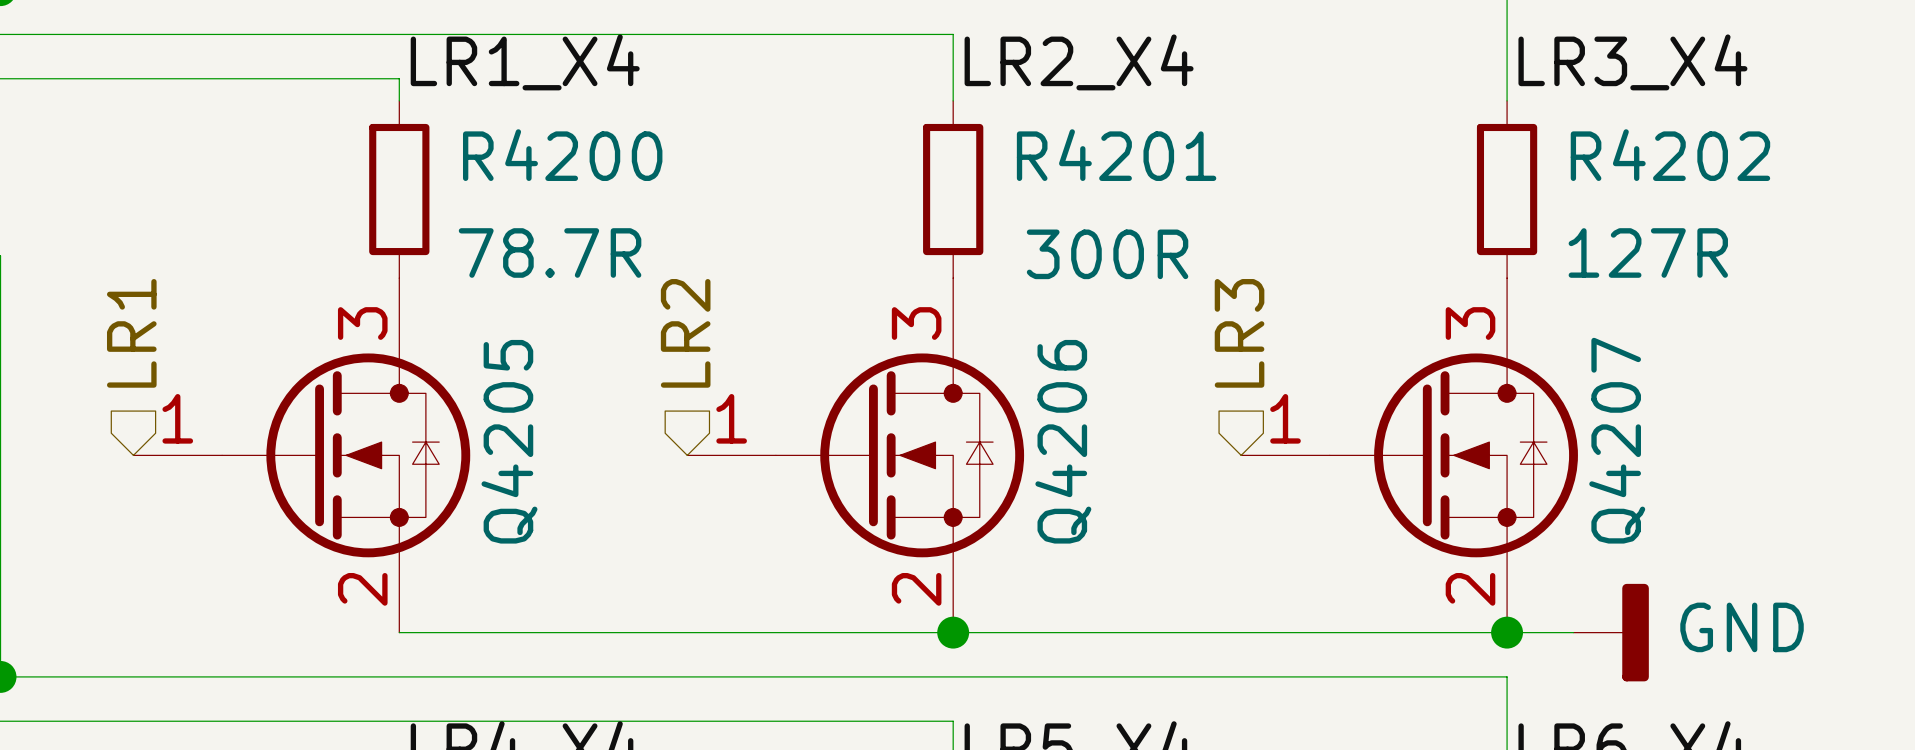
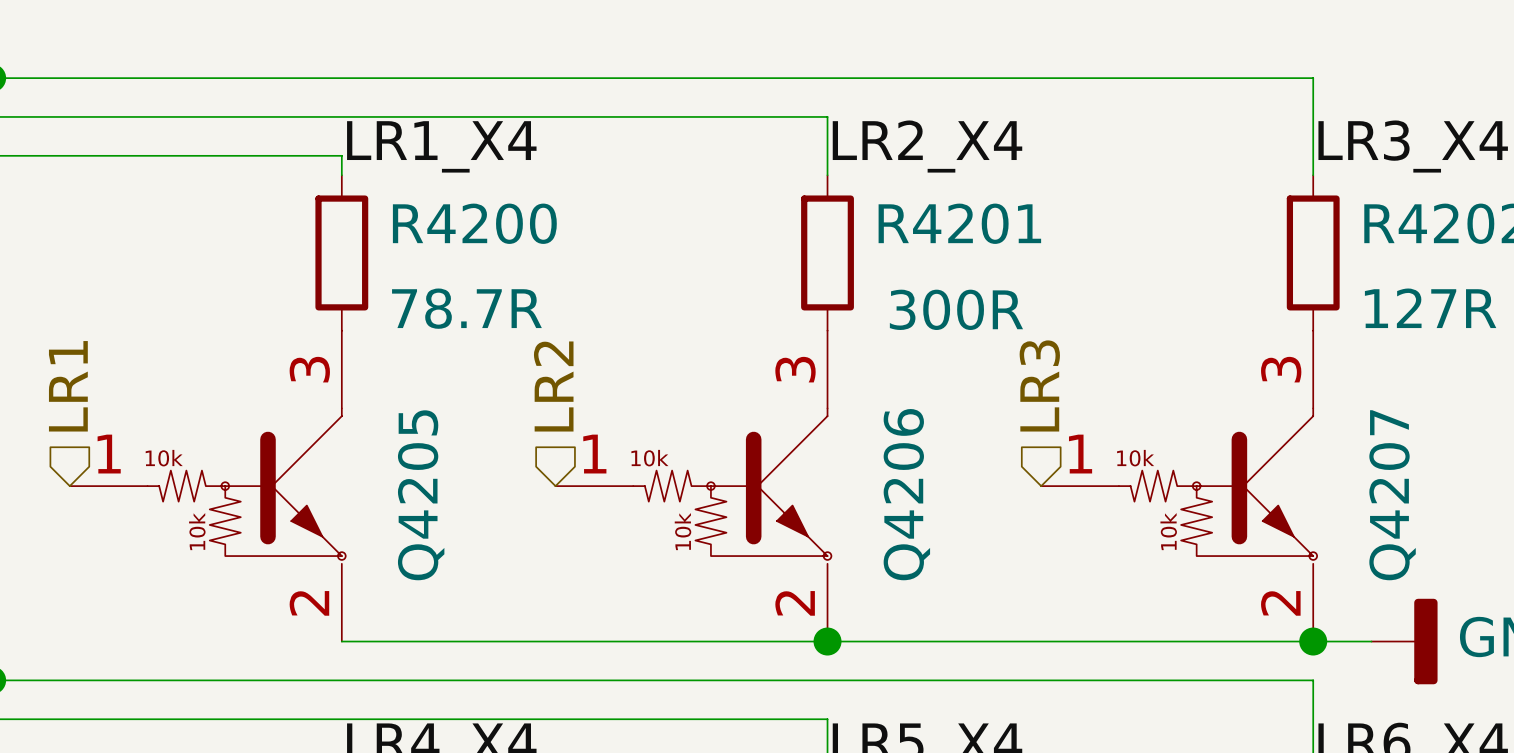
Q4205 symbol: [133, 278, 471, 633] -> [69, 330, 346, 642]
Q4206 symbol: [687, 278, 1025, 633] -> [555, 330, 832, 642]
Q4207 symbol: [1241, 278, 1578, 633] -> [1041, 330, 1318, 642]
hierarchical label position: LR1 (131, 333) -> LR1 (68, 386)
hierarchical label position: LR2 (685, 333) -> LR2 (553, 386)
hierarchical label position: LR3 (1239, 333) -> LR3 (1039, 385)

